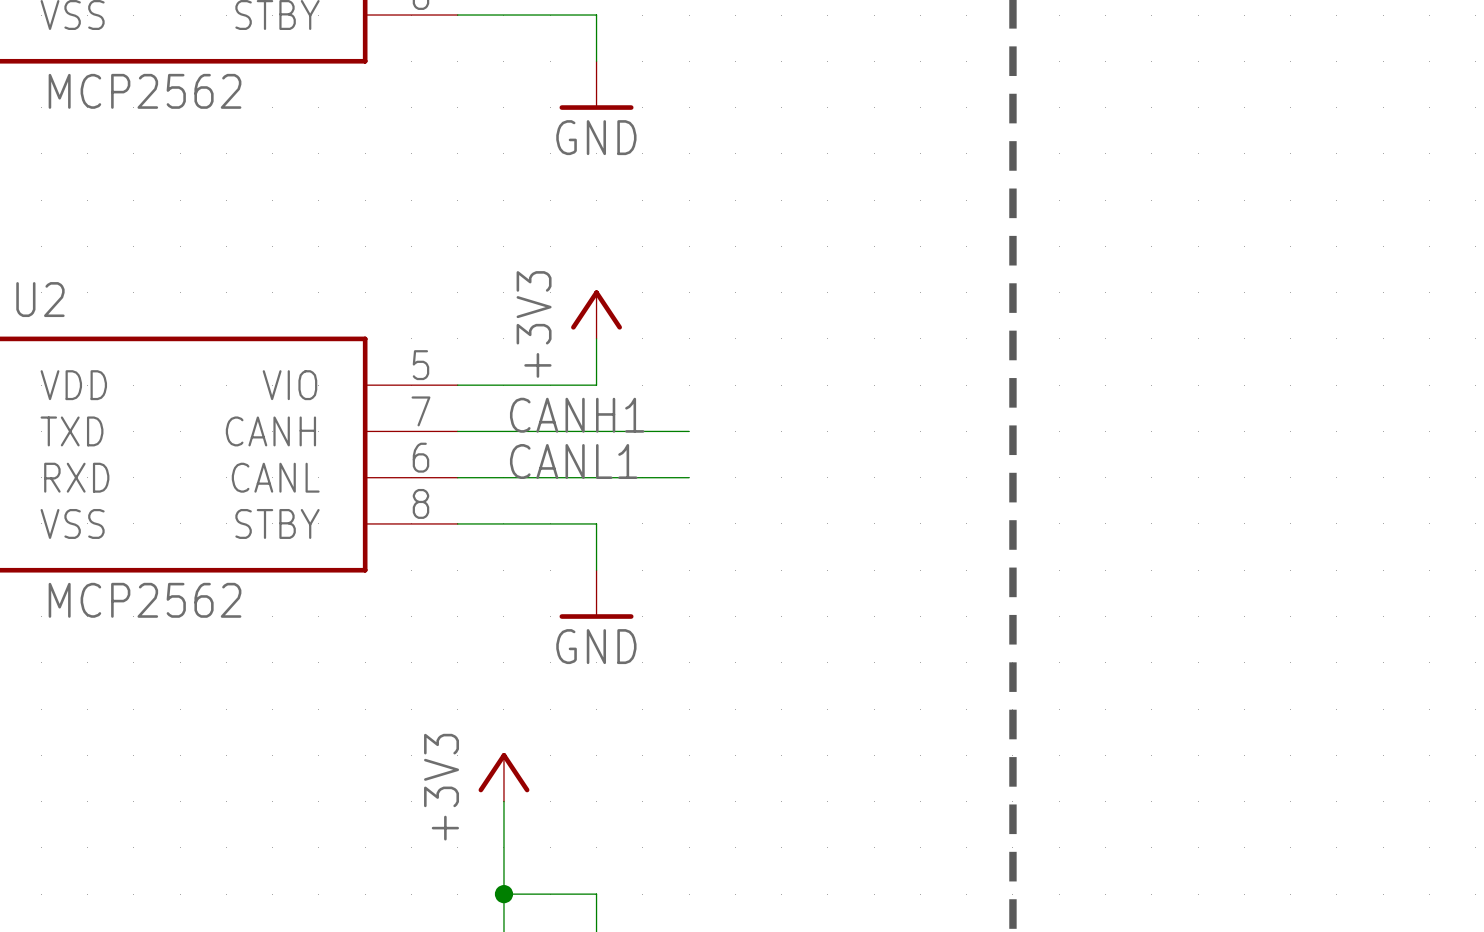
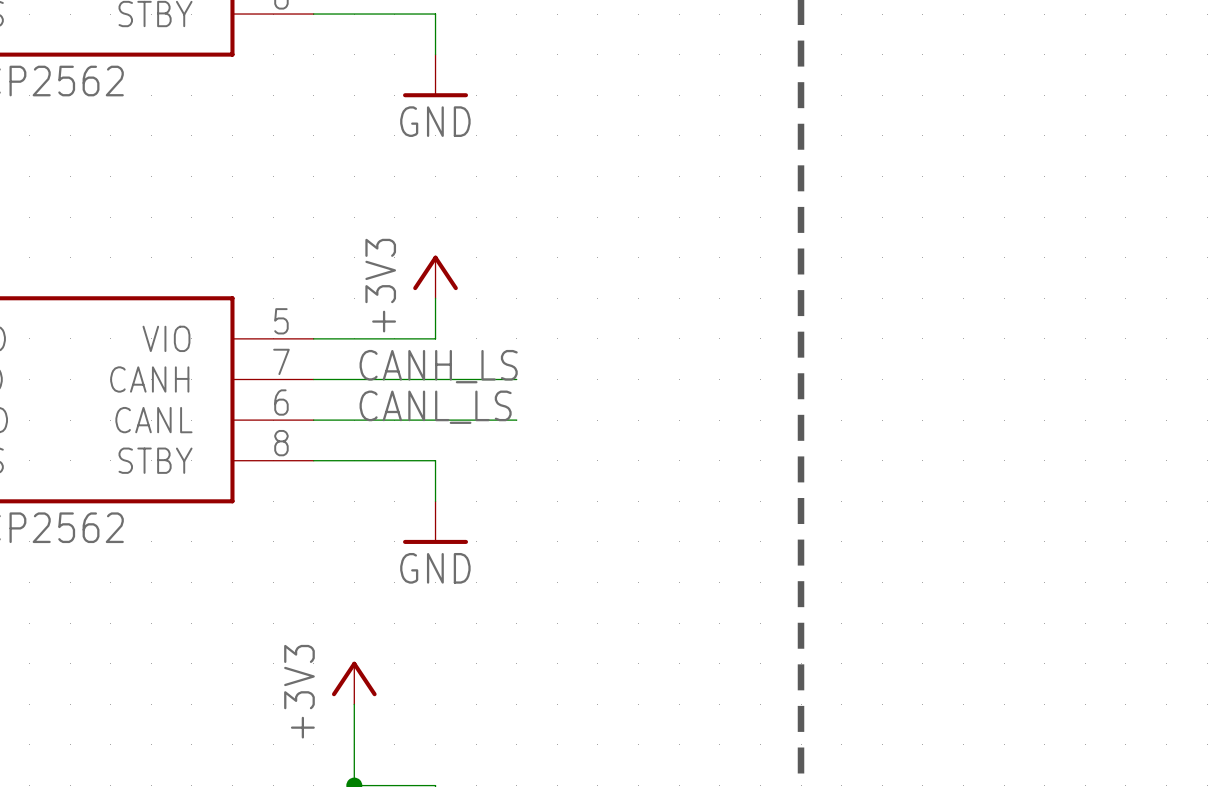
label: CANH1 (577, 415) -> CANH_LS (438, 366)
label: CANL1 (573, 461) -> CANL_LS (435, 407)

